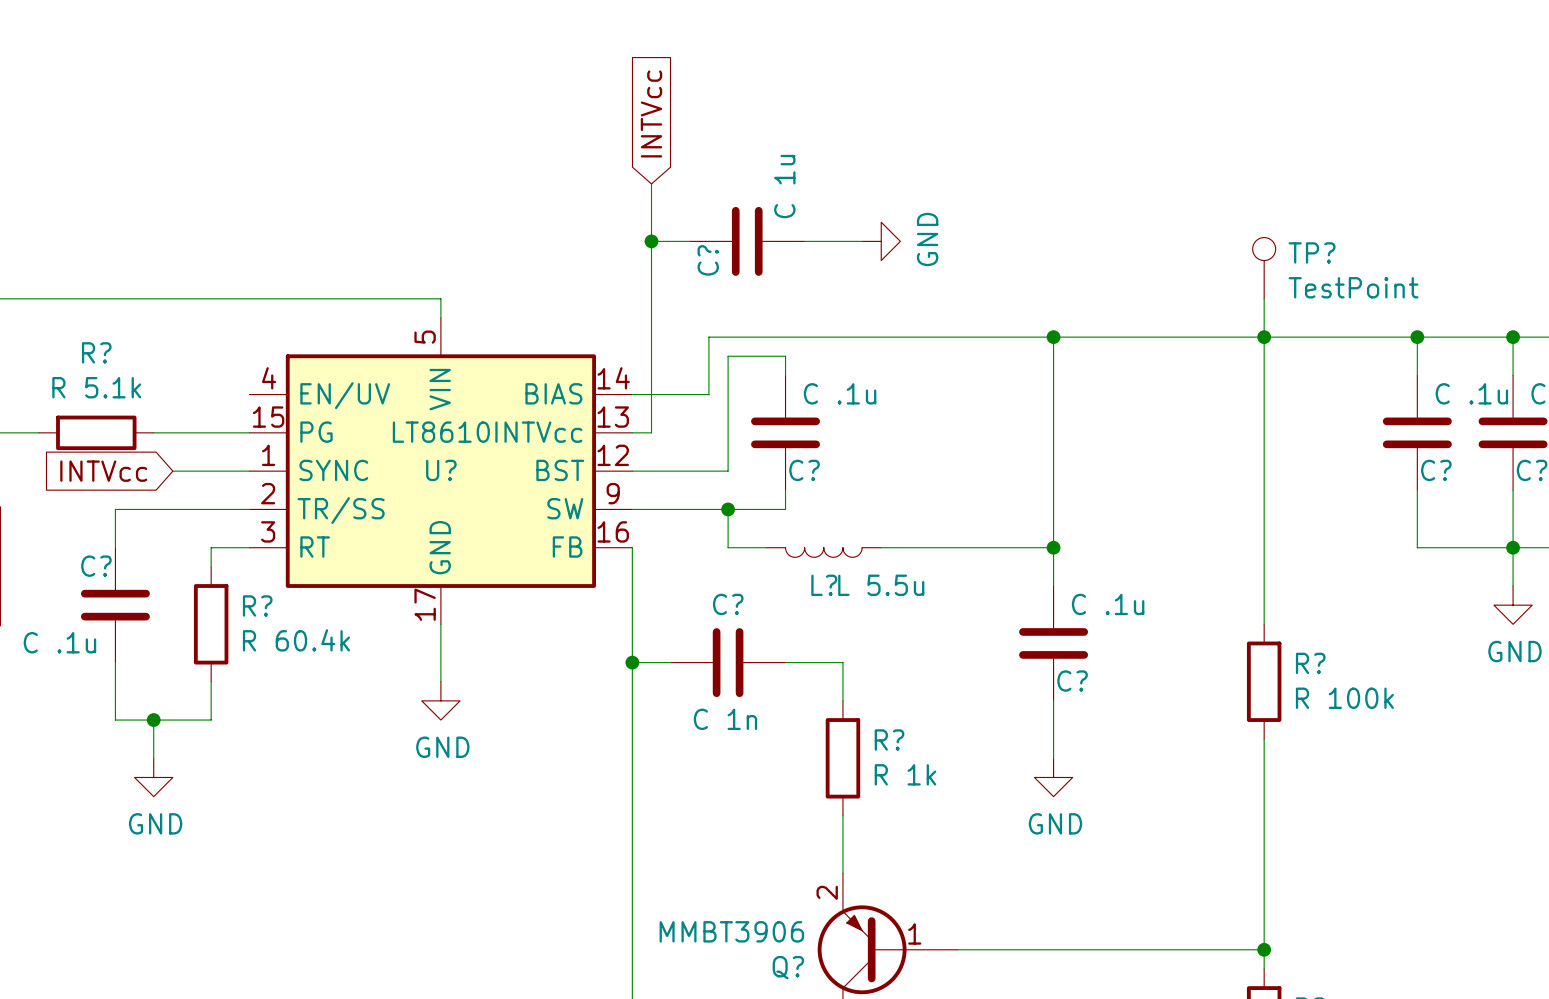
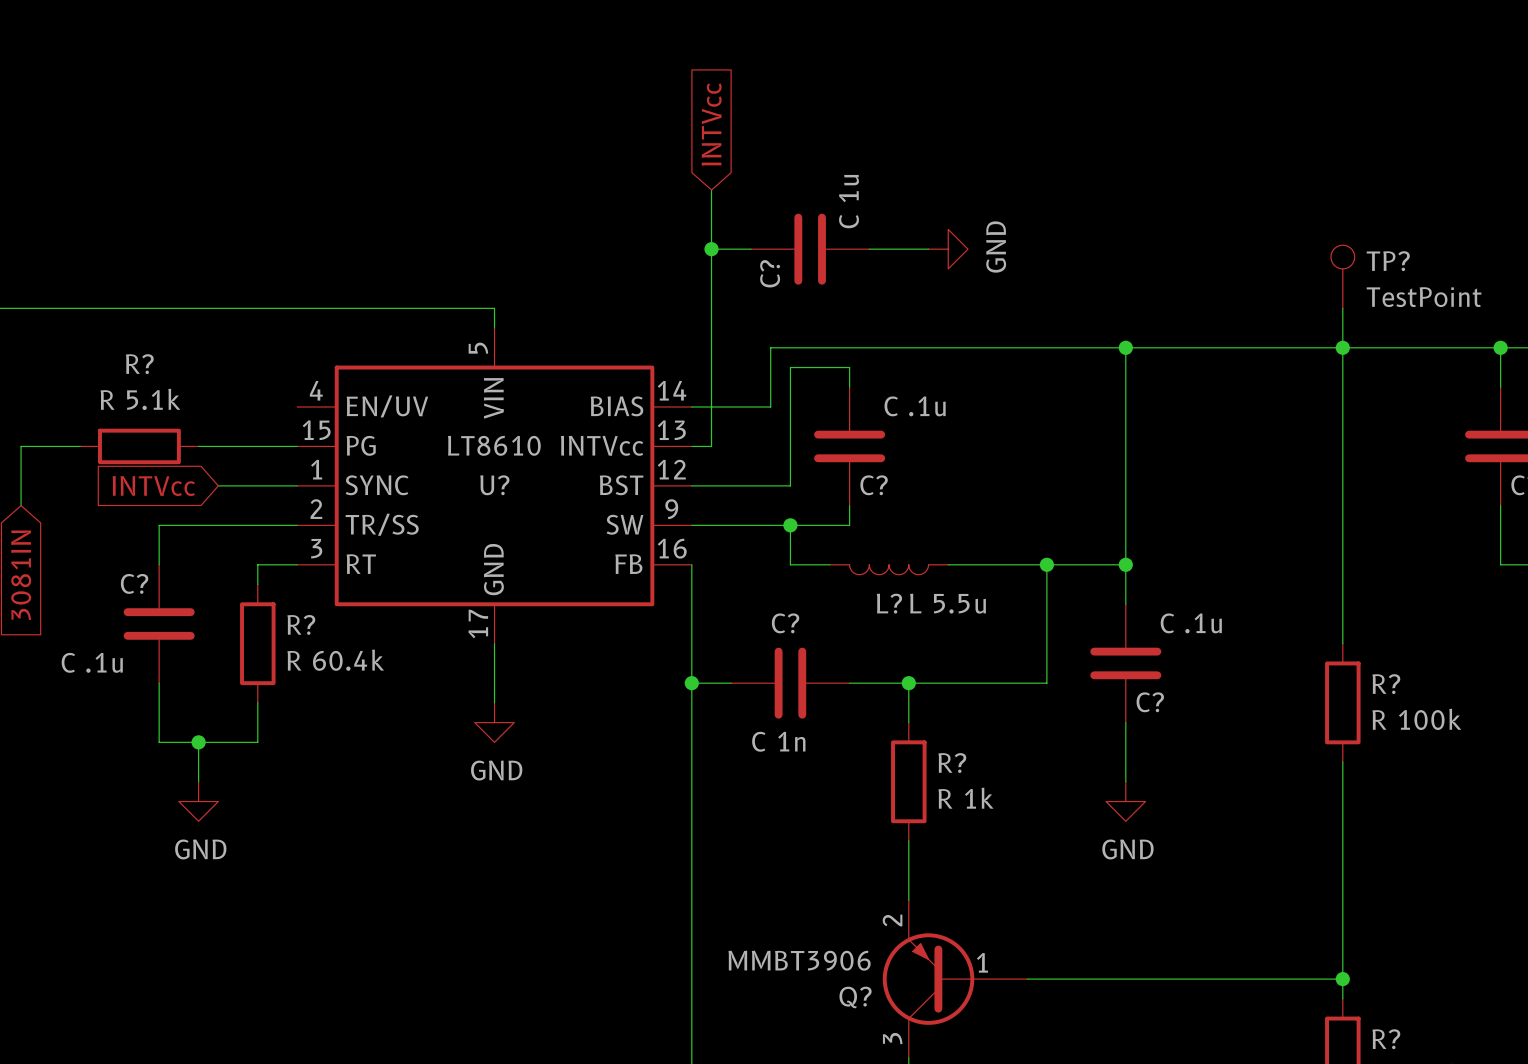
wire: none -> (1046, 564) (1046, 683) (908, 683)
junction: none -> (1046, 564)
junction: none -> (908, 683)

